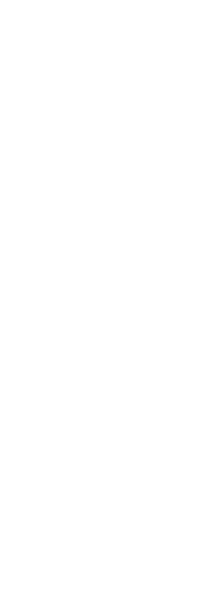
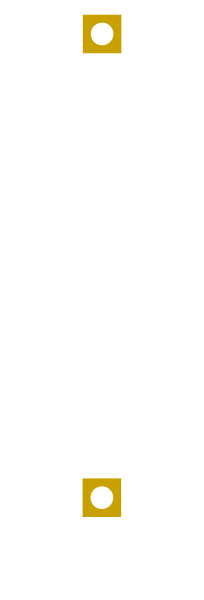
part: none -> (102, 33)
part: none -> (101, 497)

